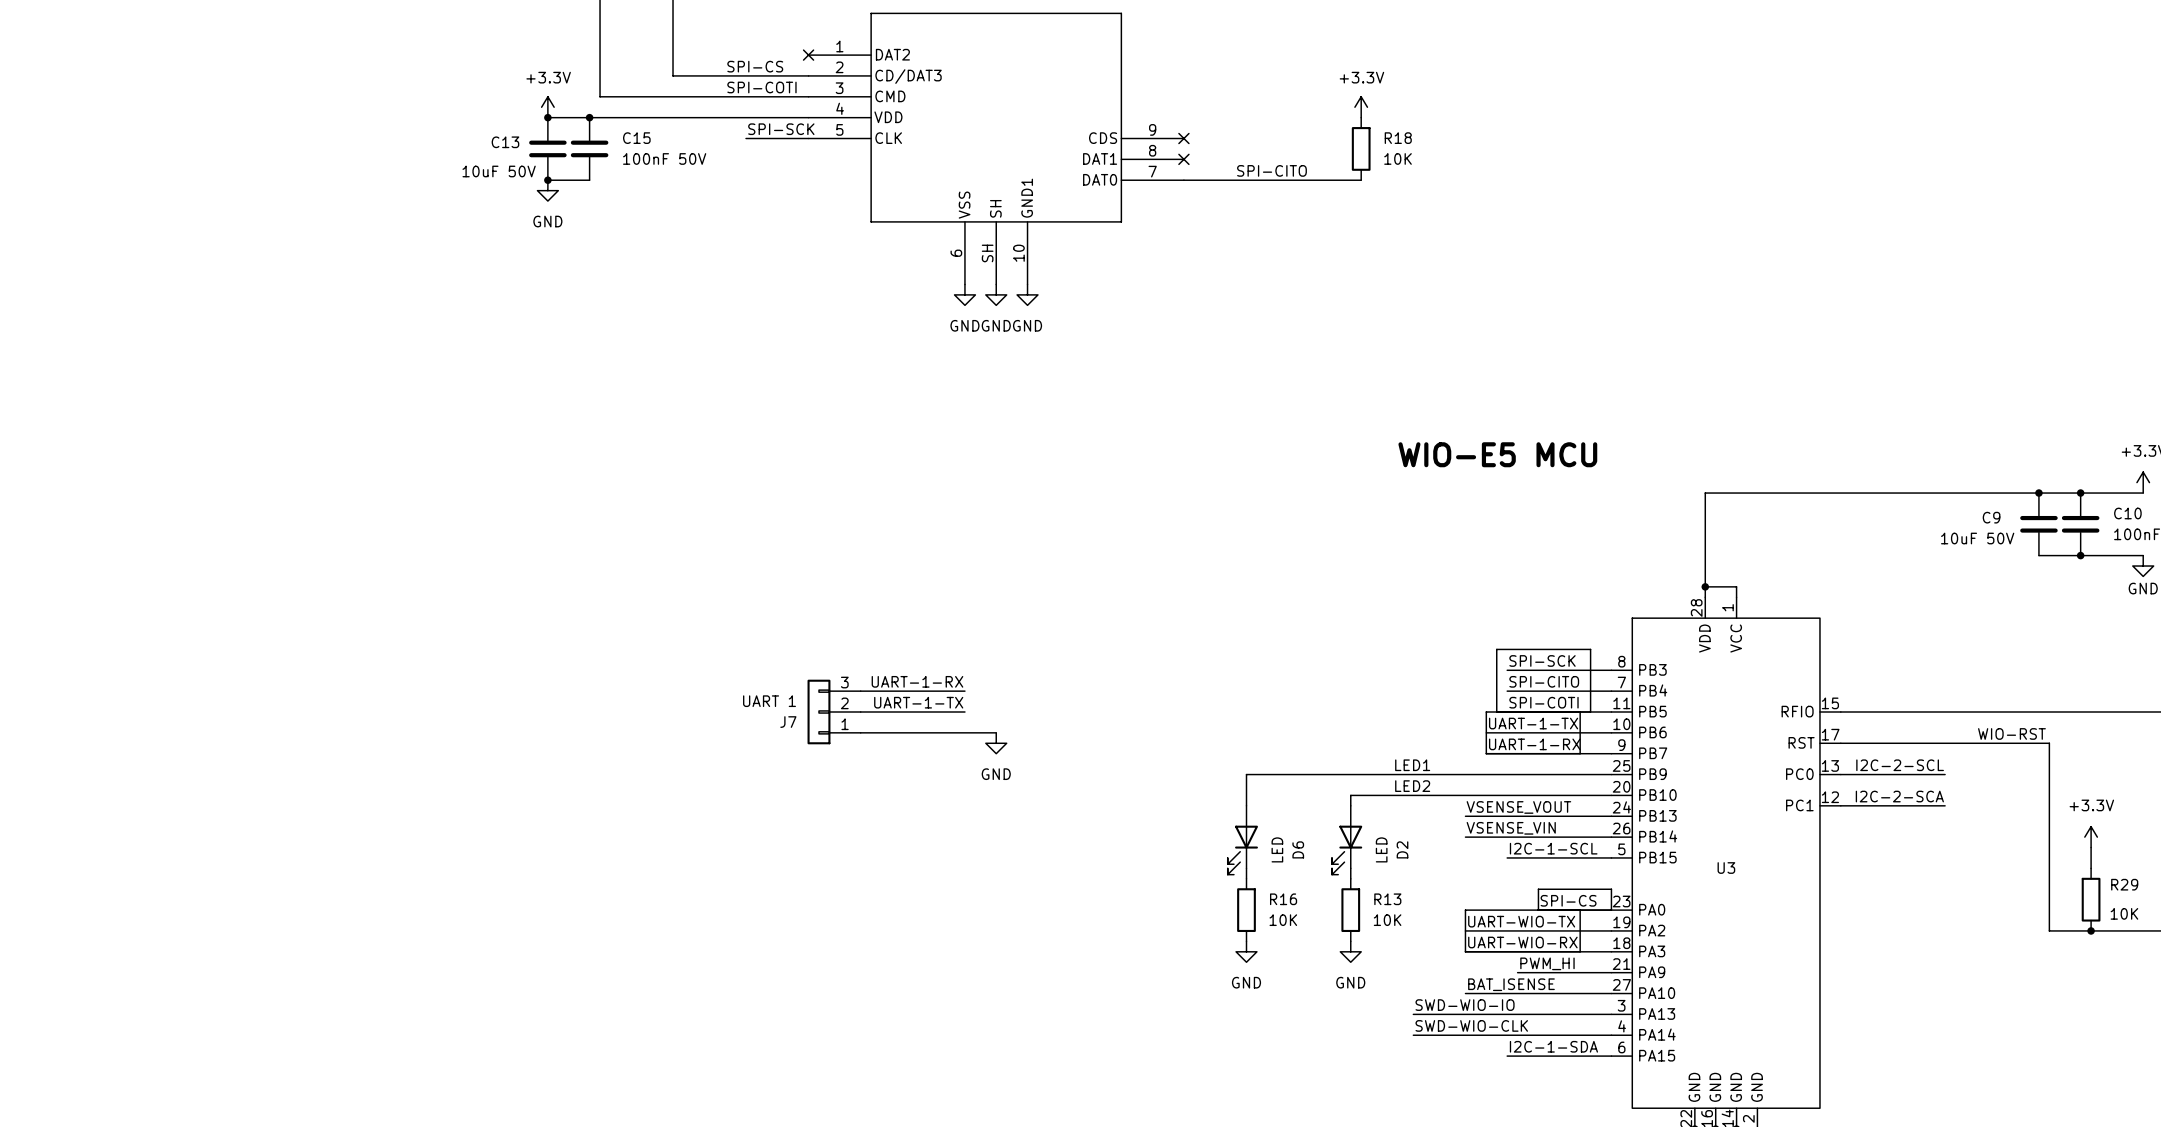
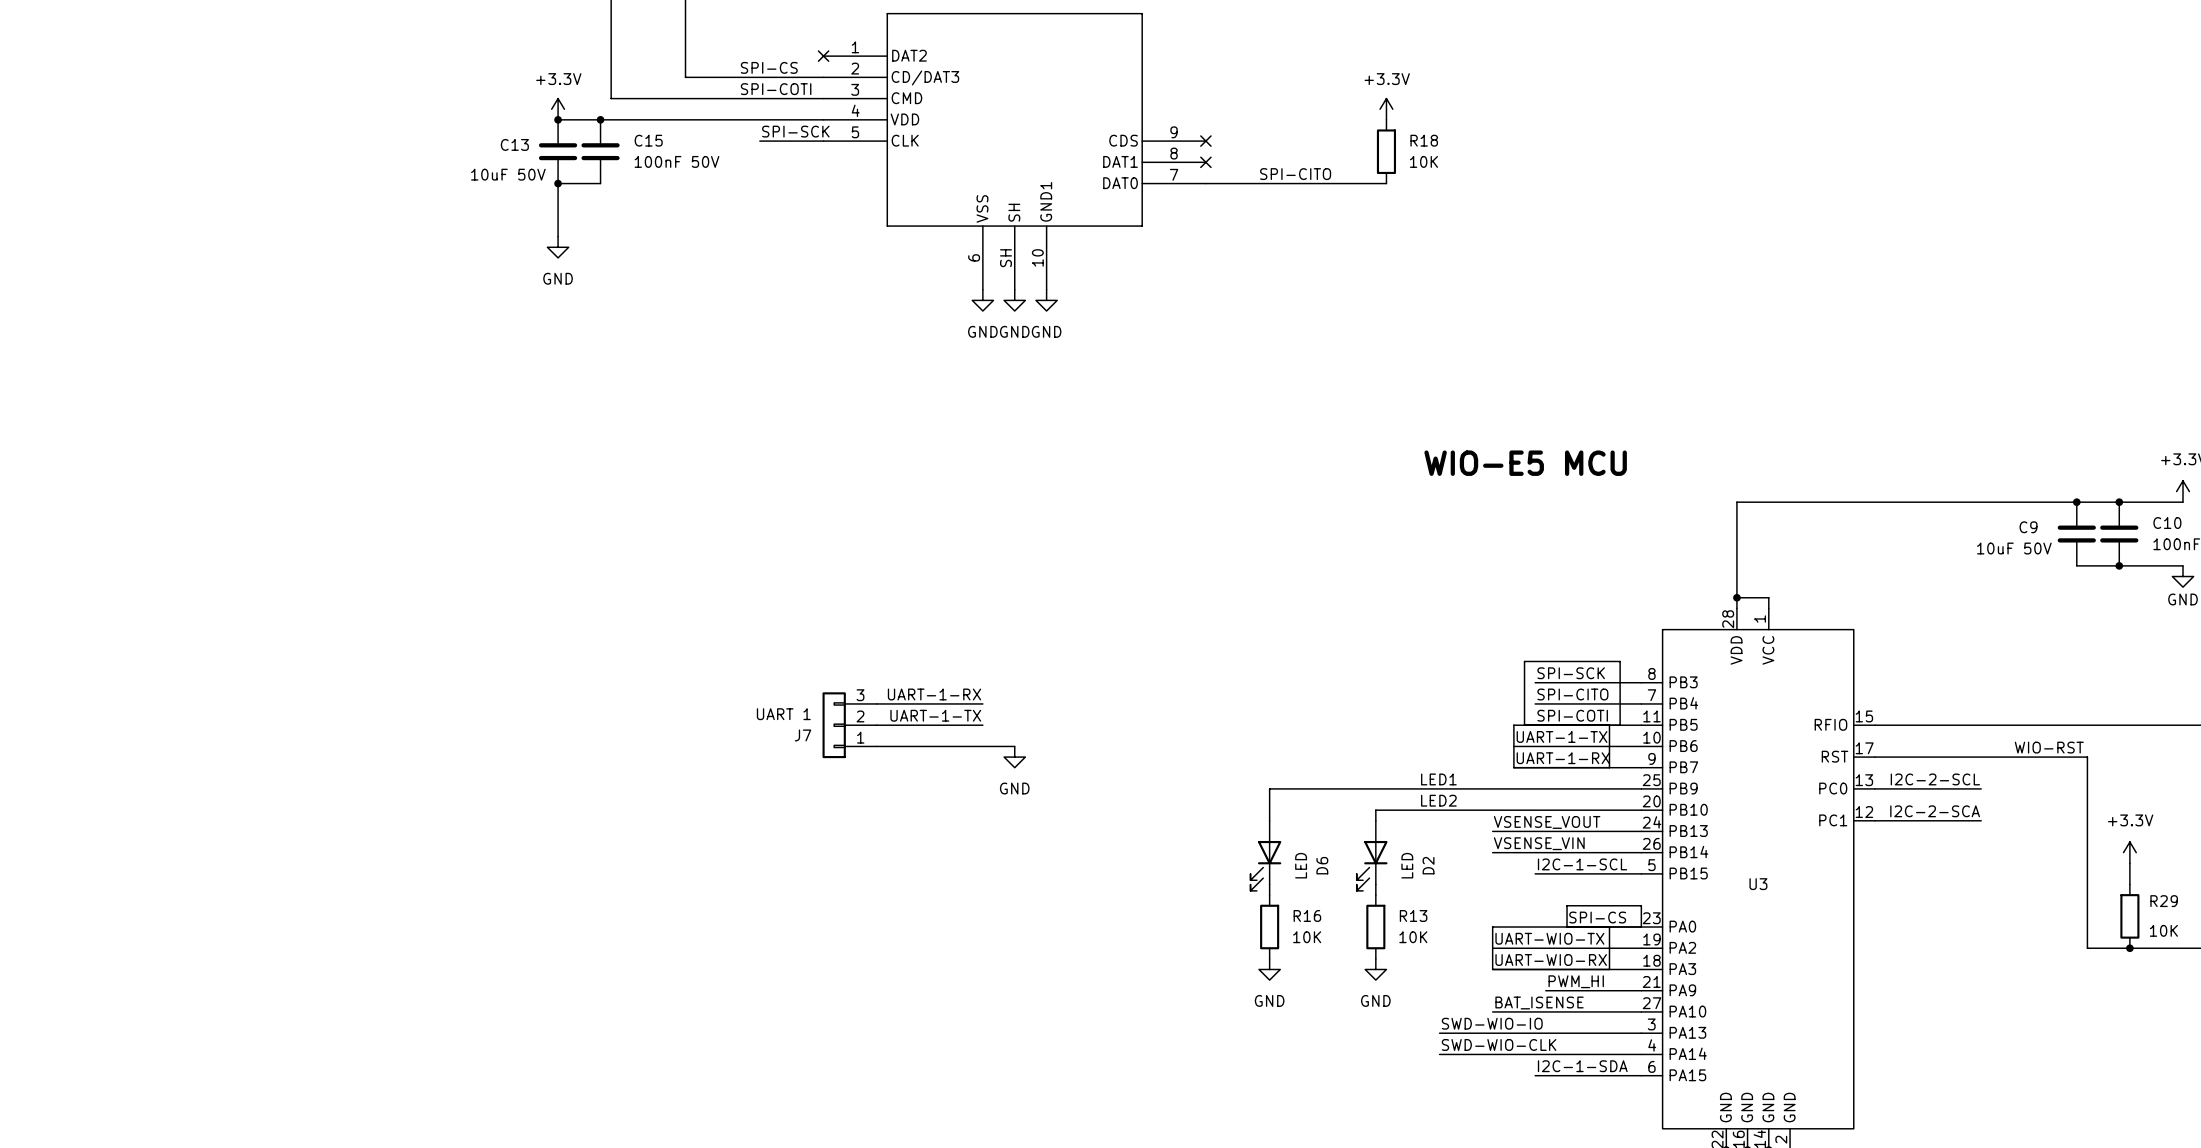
wire: none -> (558, 183) (558, 236)
power symbol position: GND (547, 190) -> GND (558, 247)

